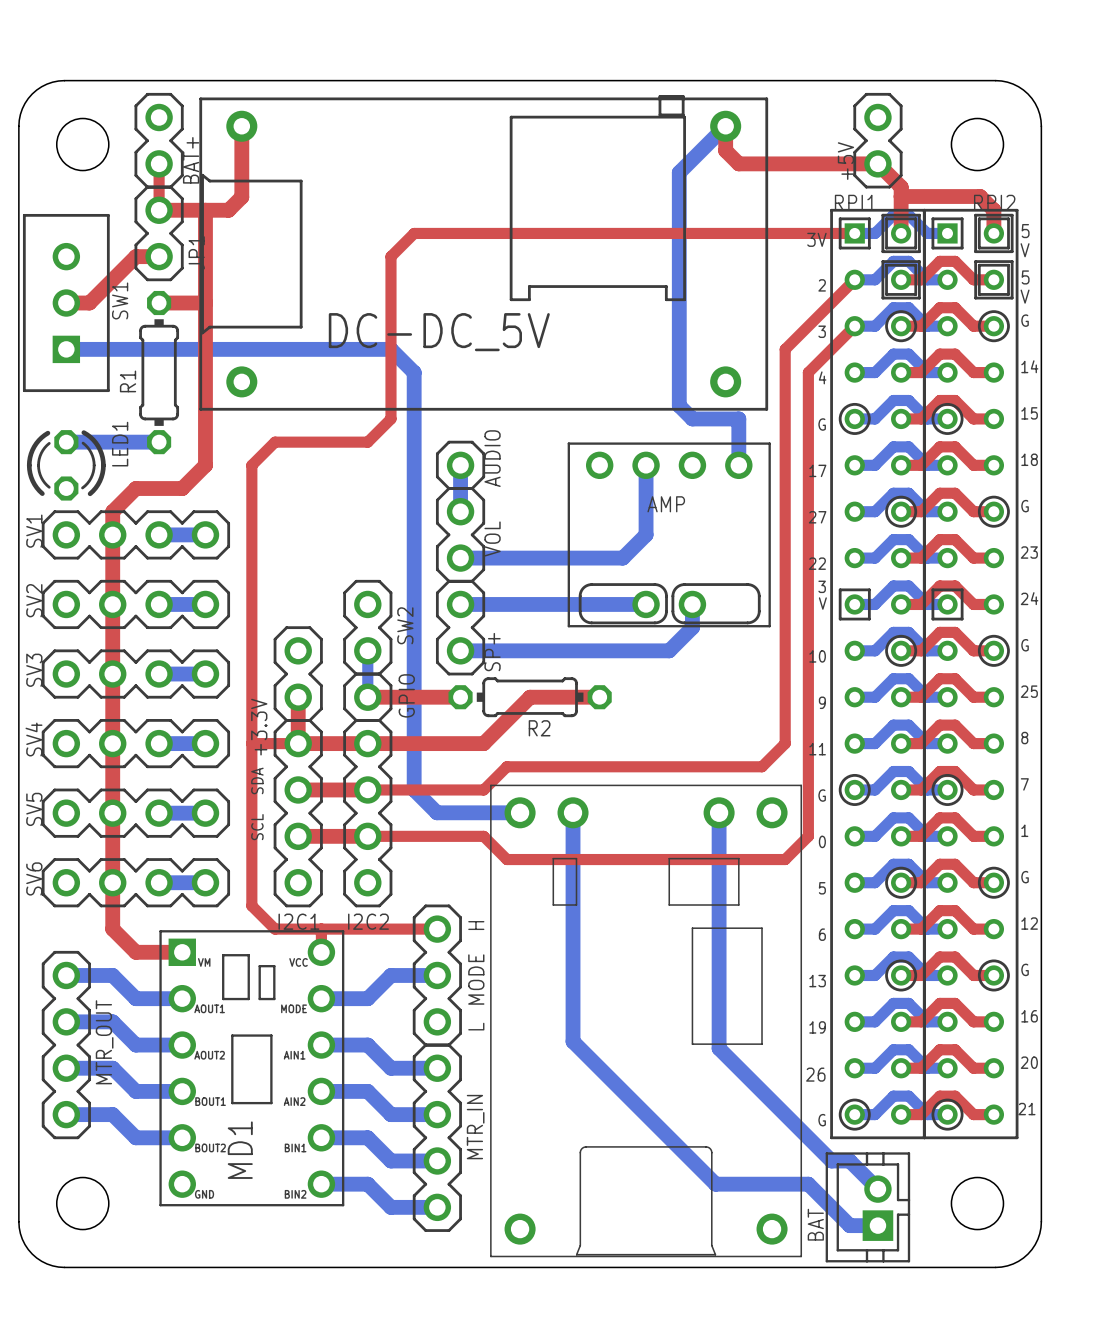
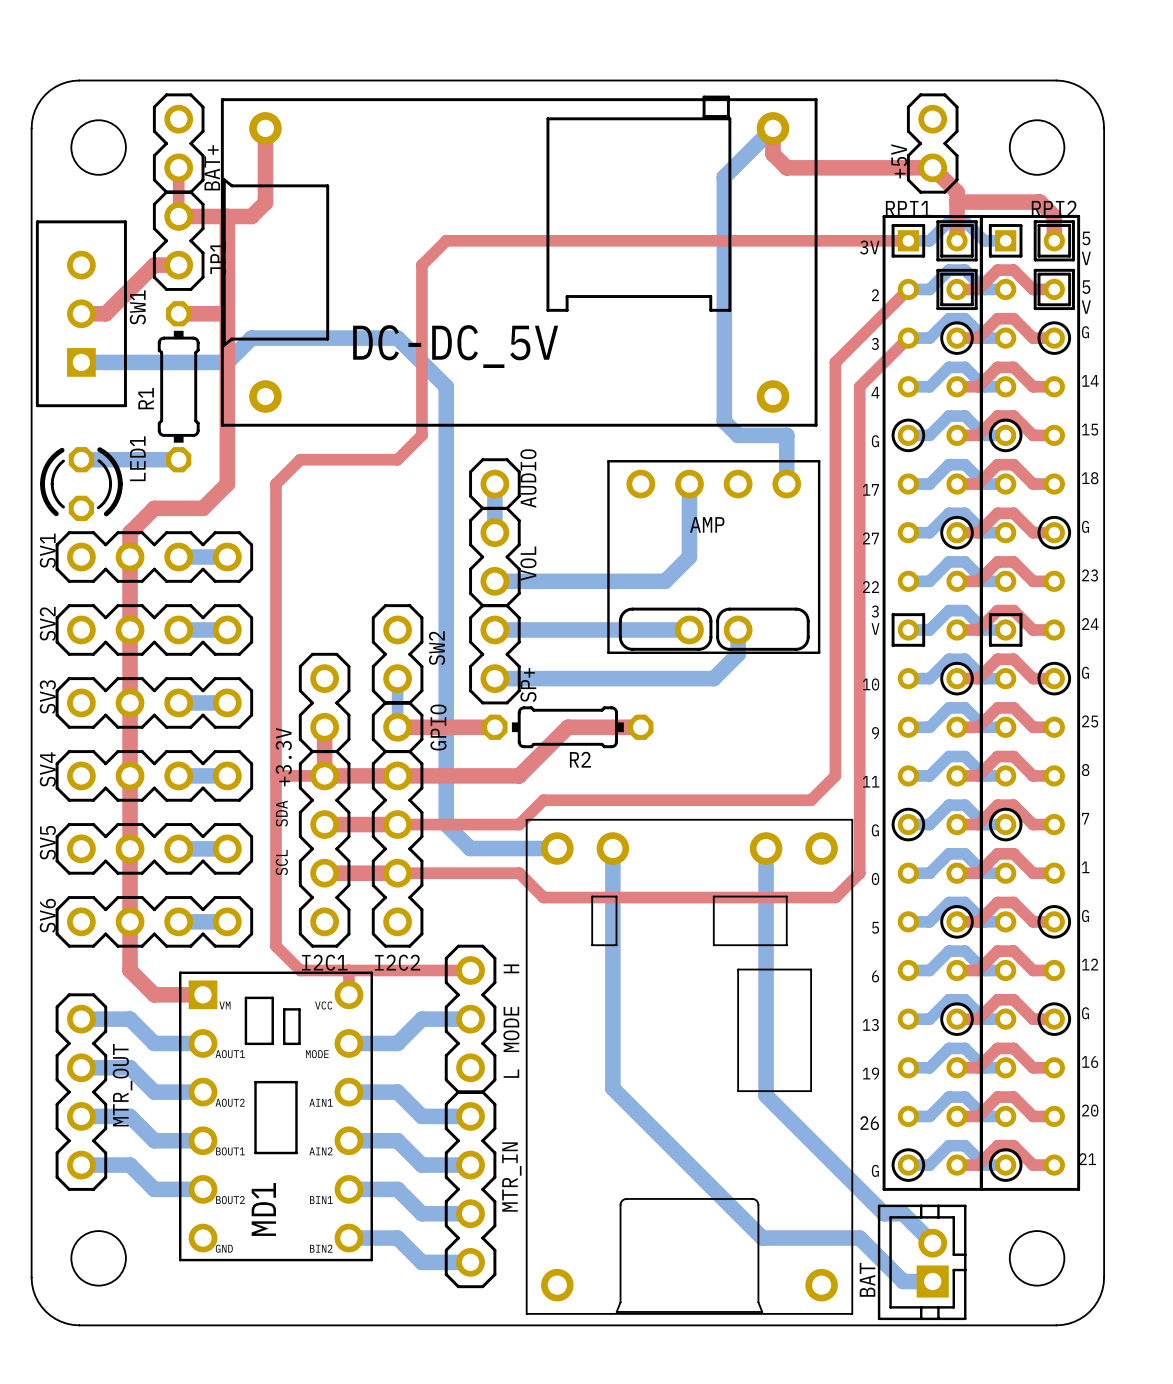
bottom track: (205, 349) (390, 349) -> (227, 362) (251, 338) (397, 338) (421, 362)

